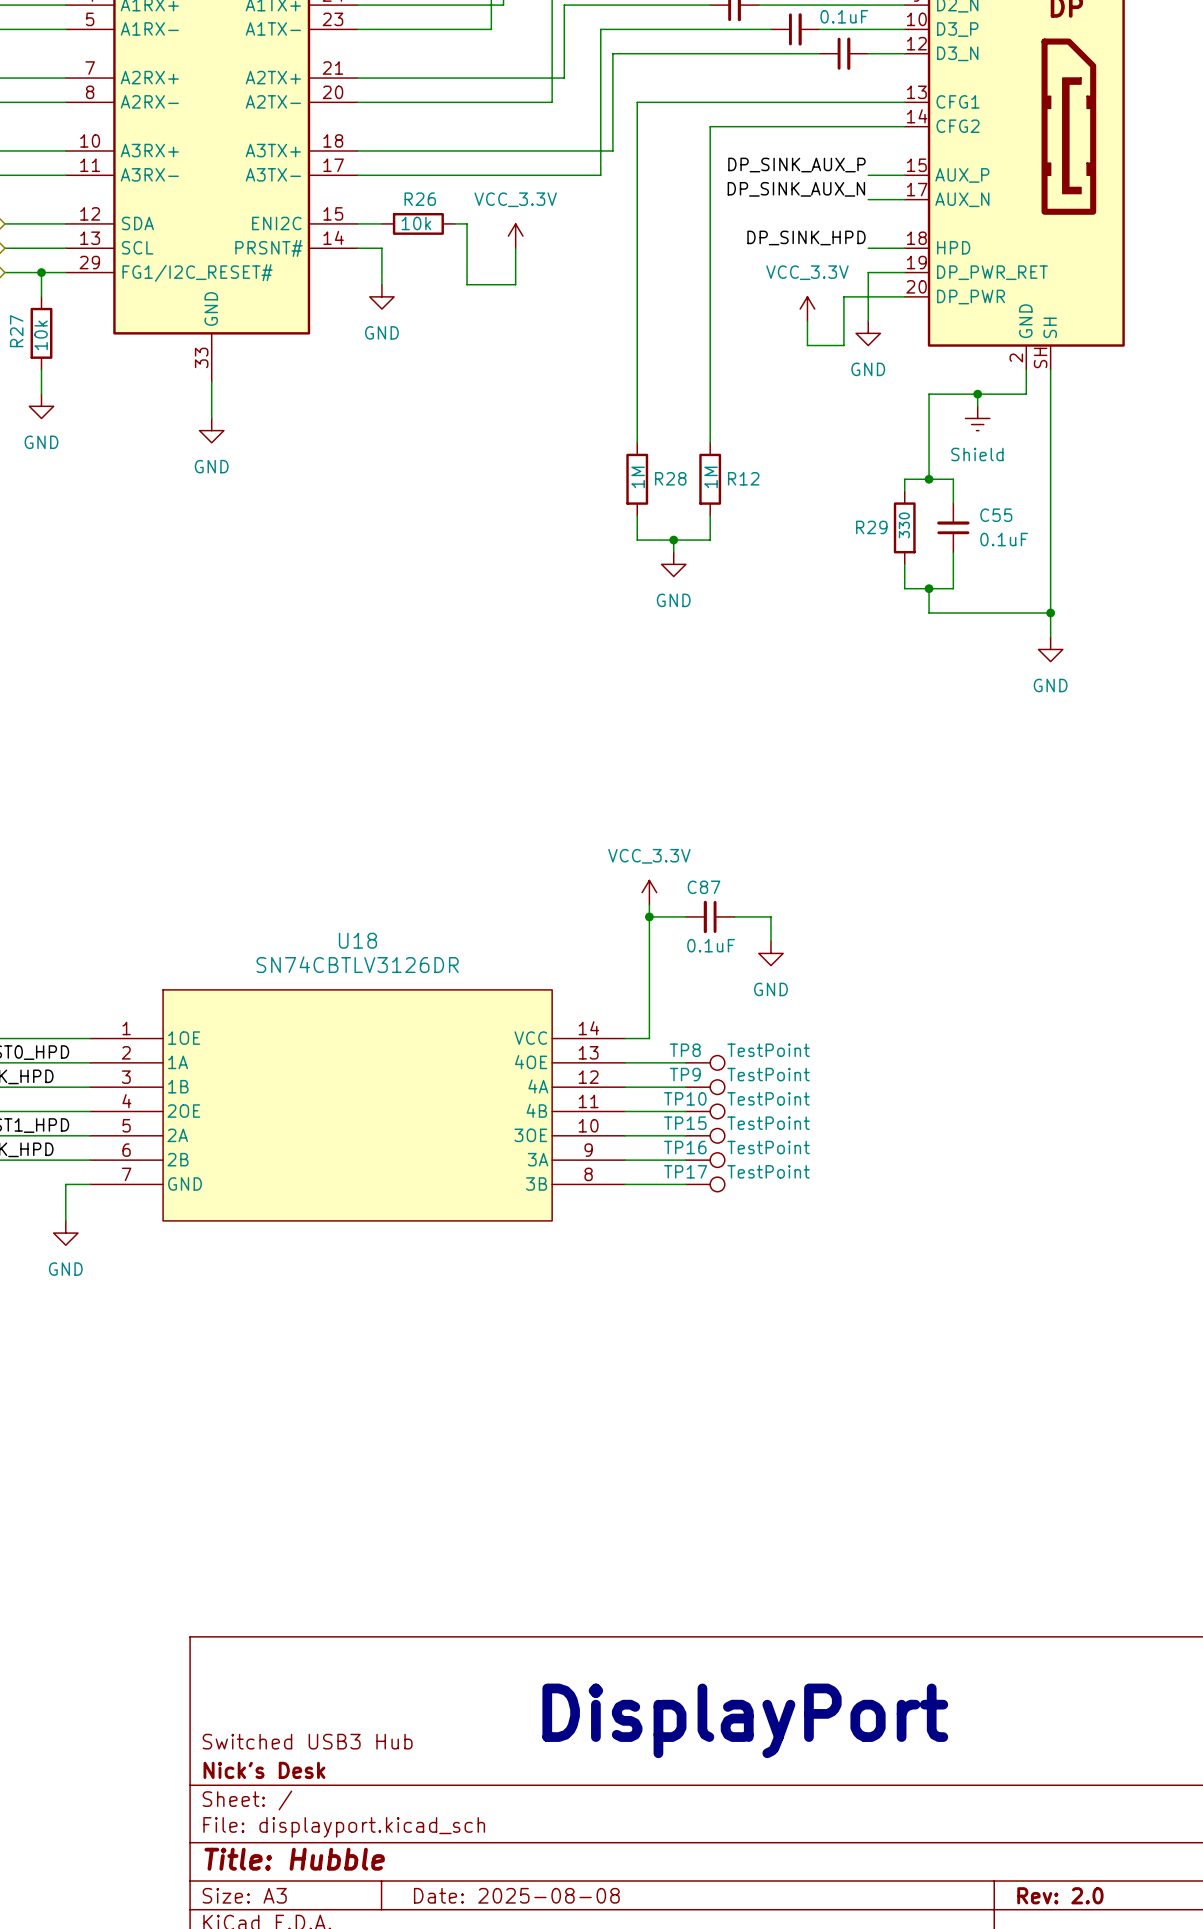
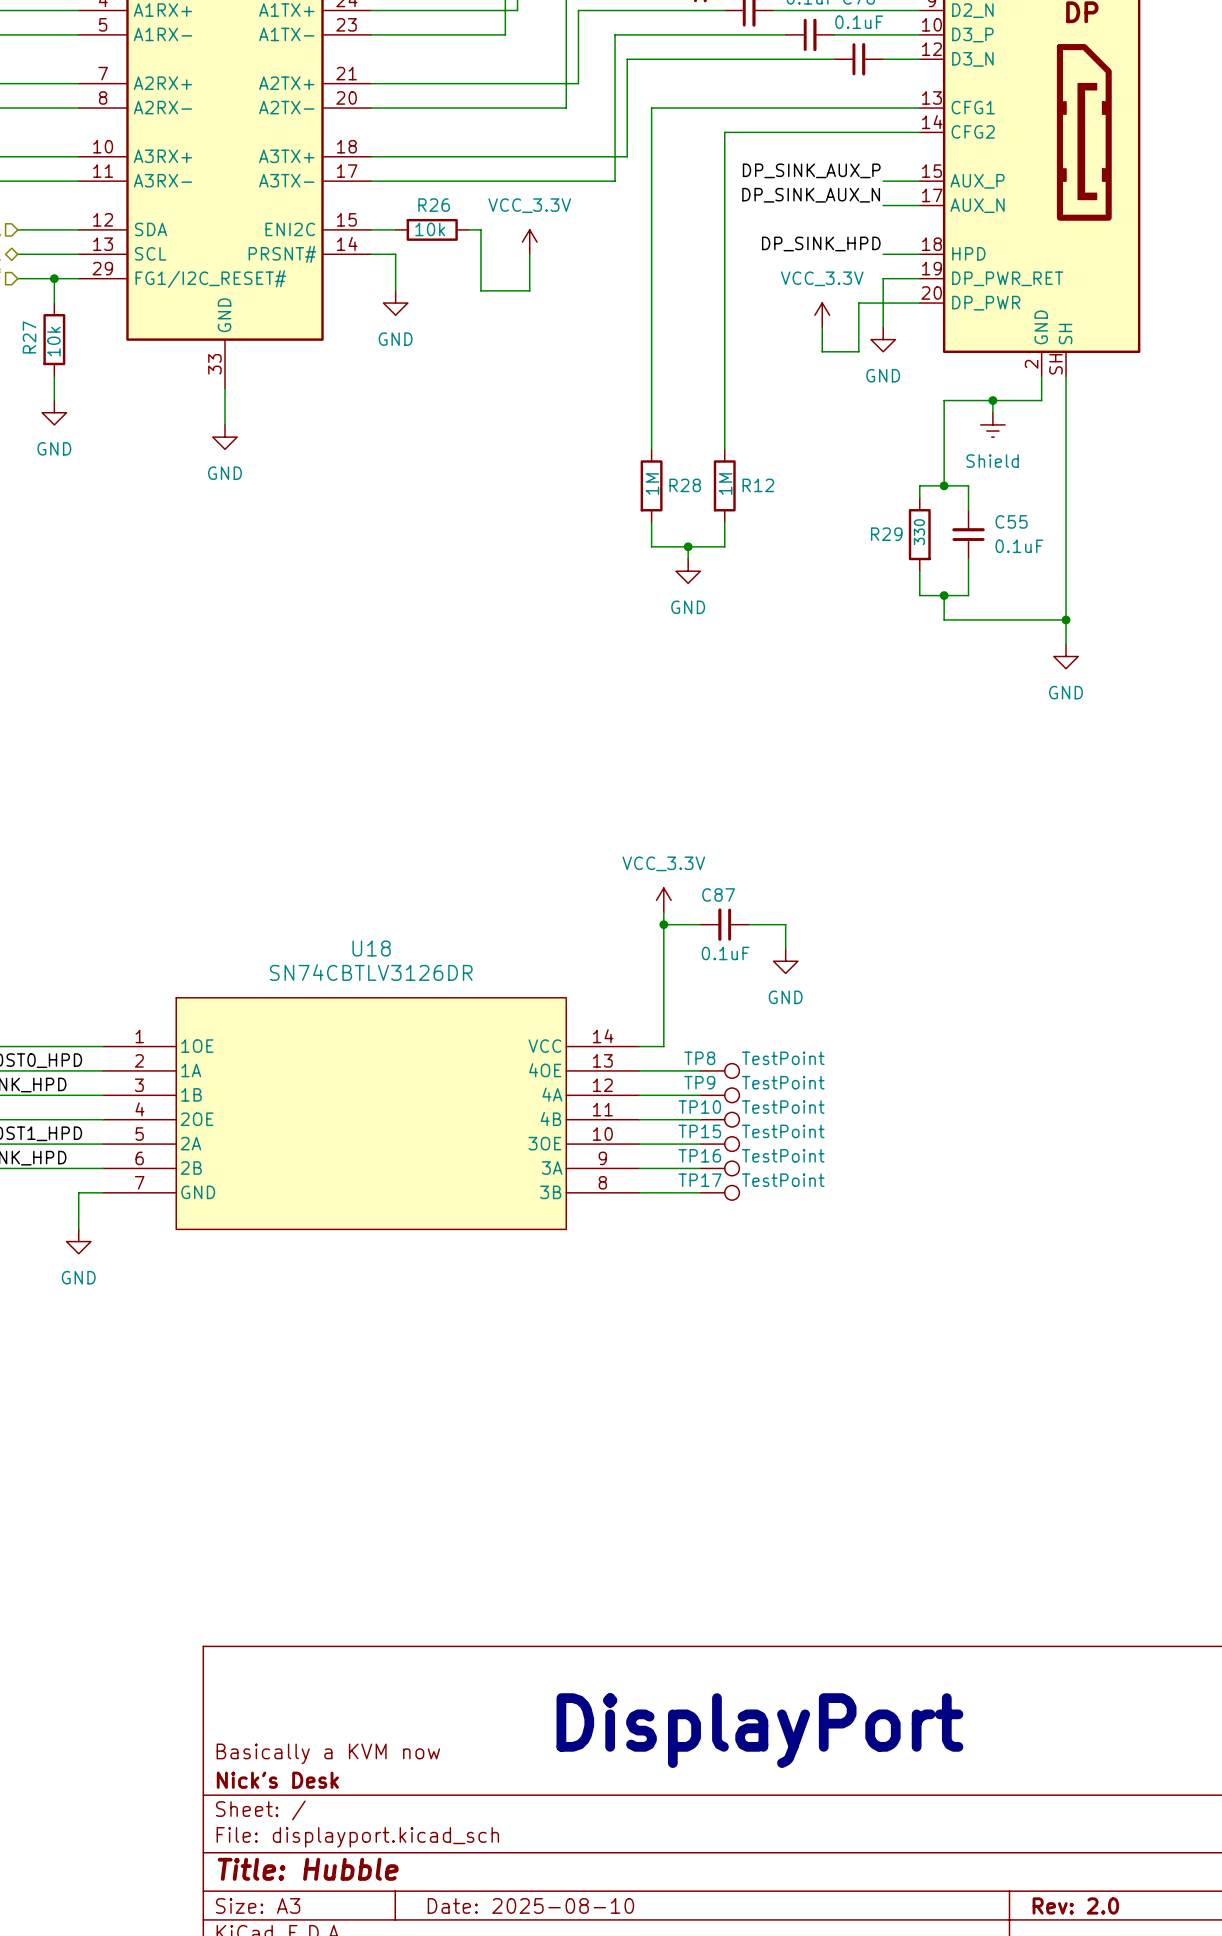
title block: Switched USB3 Hub (307, 1741) -> Basically a KVM now (328, 1753)
title block: Date: 2025-08-08 (516, 1895) -> Date: 2025-08-10 (530, 1905)

